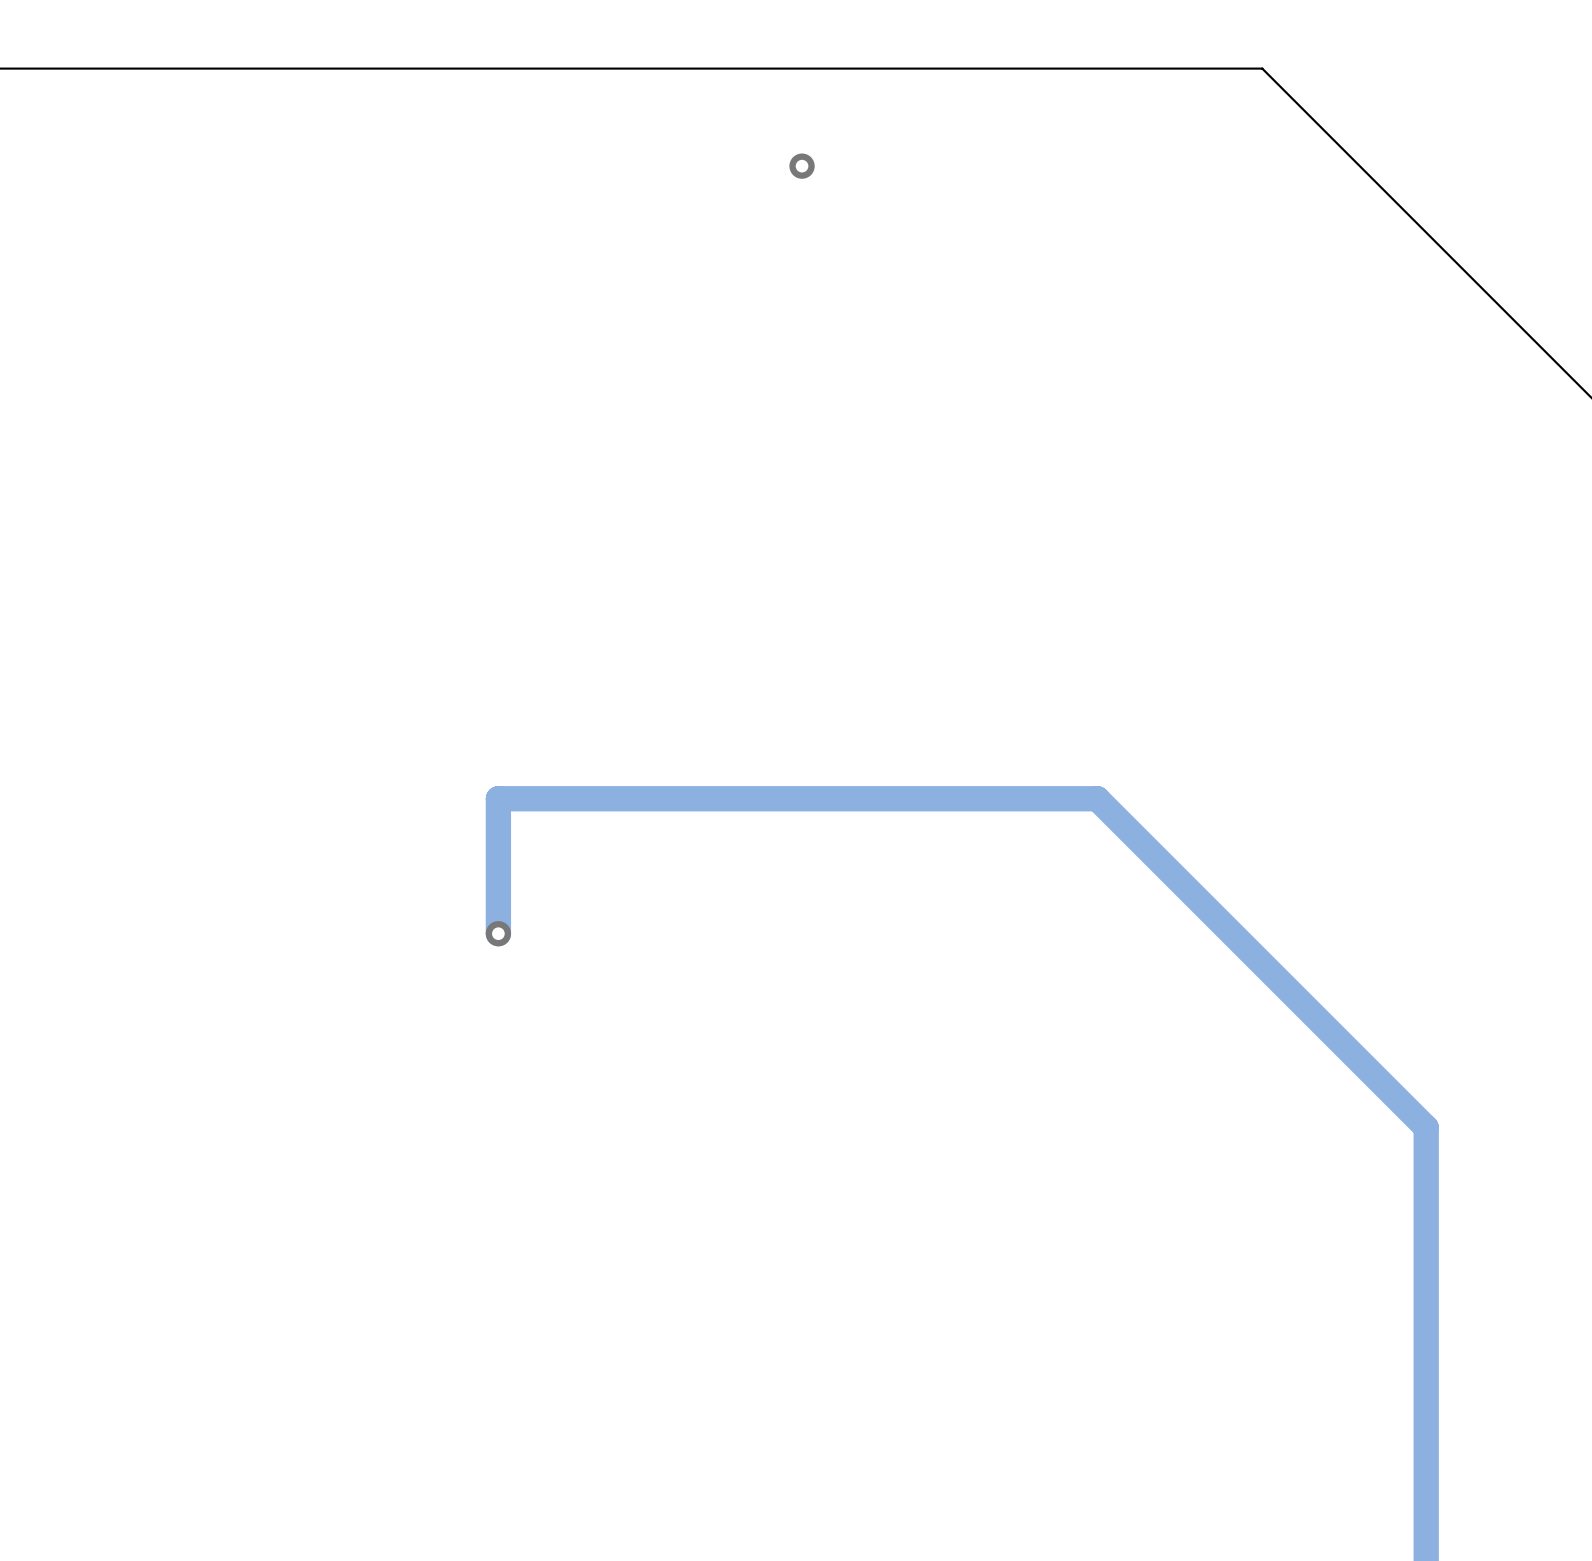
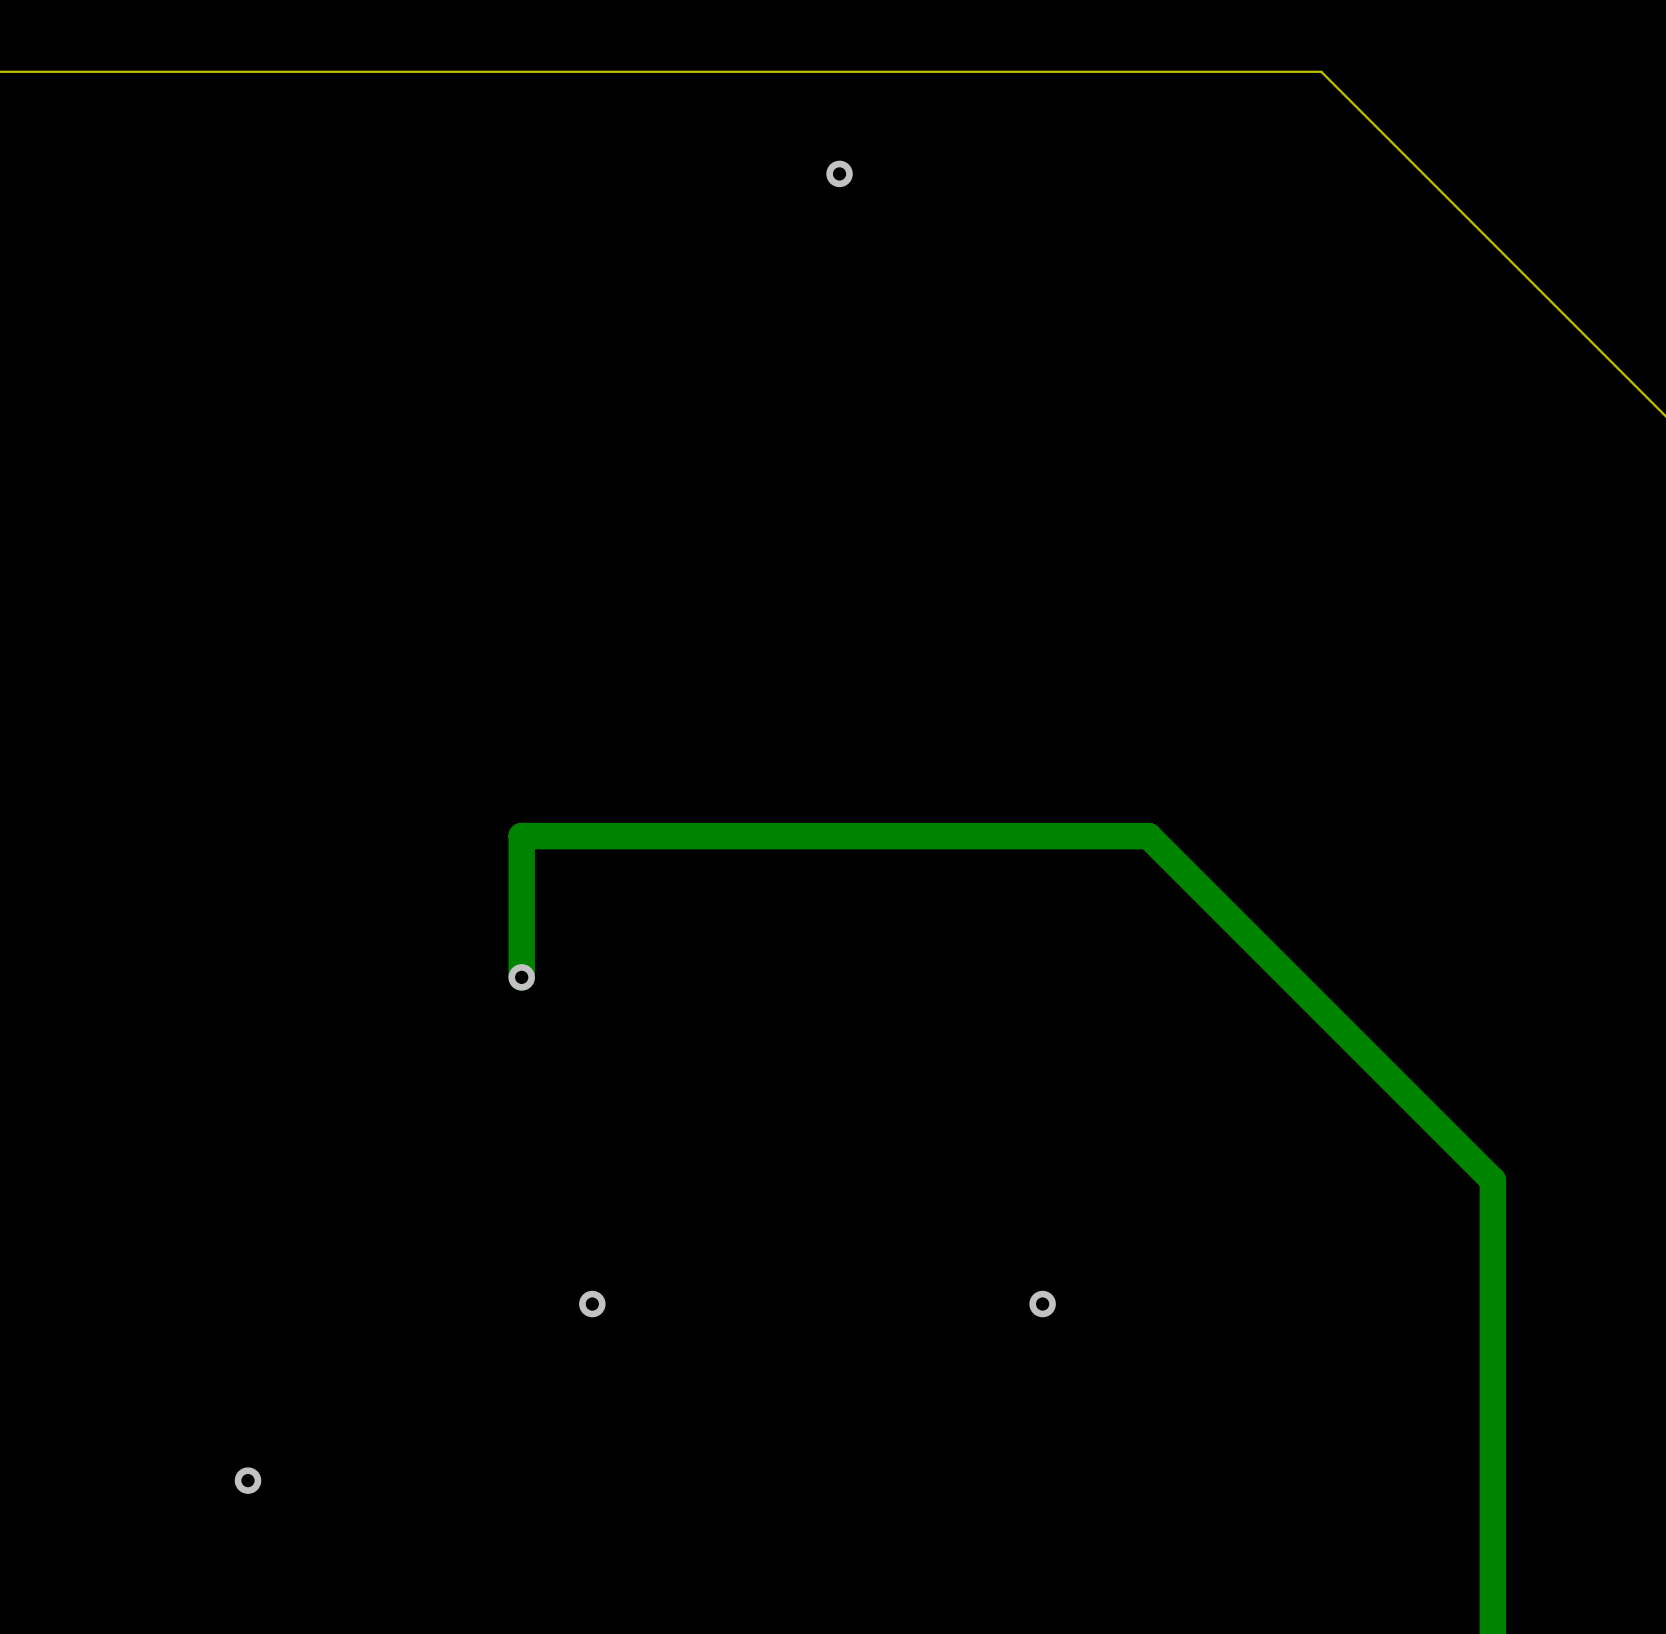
via: none -> (592, 1304)
via: none -> (1042, 1304)
via: none -> (248, 1480)

